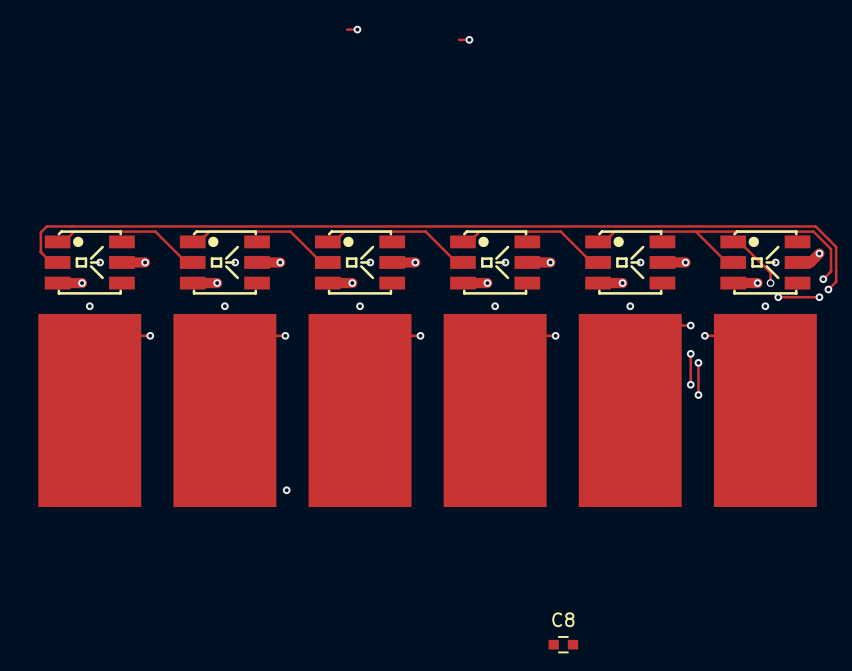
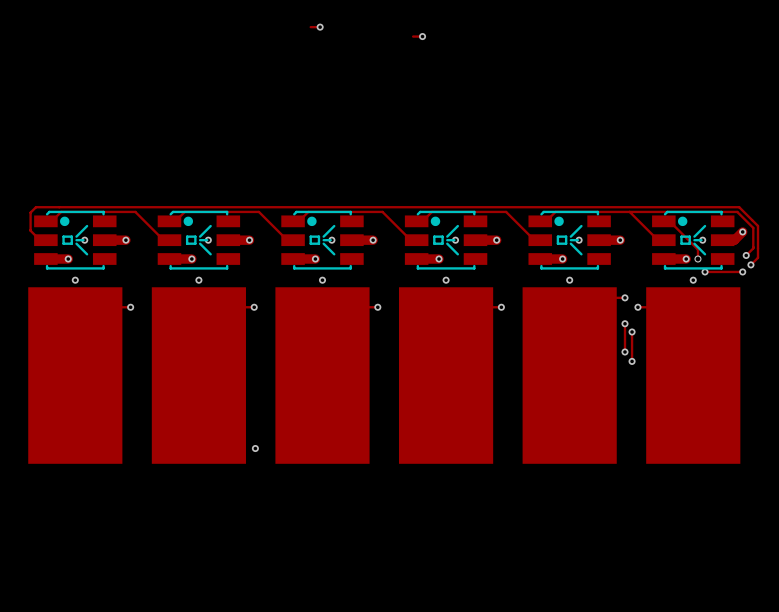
C8: (563, 644) -> none

